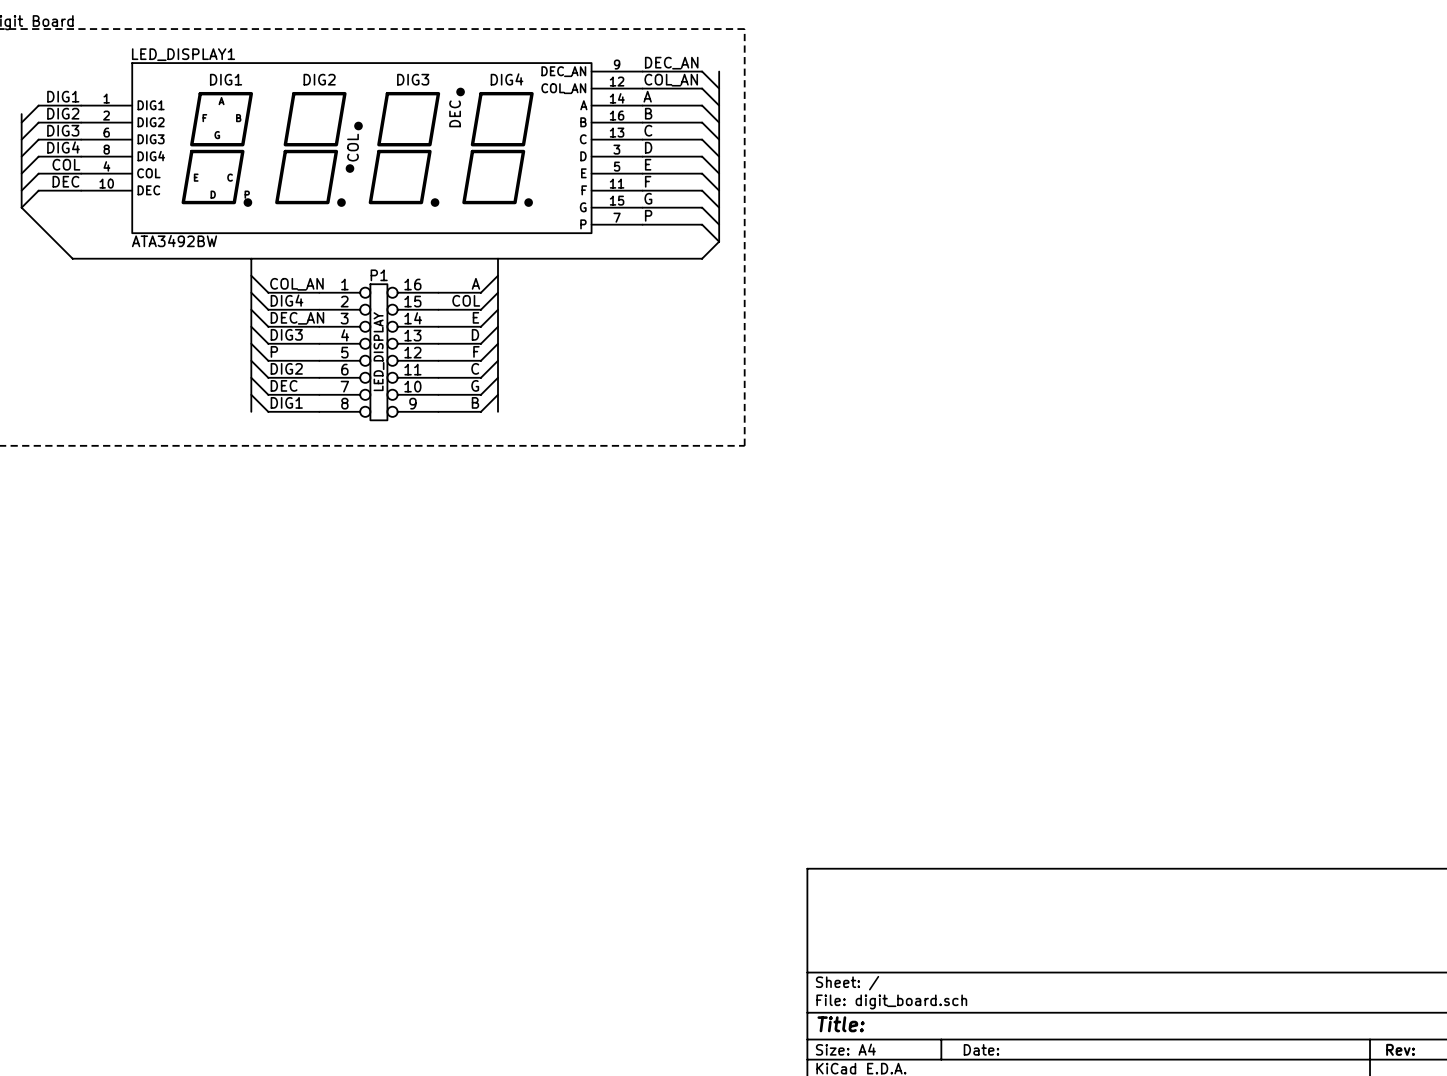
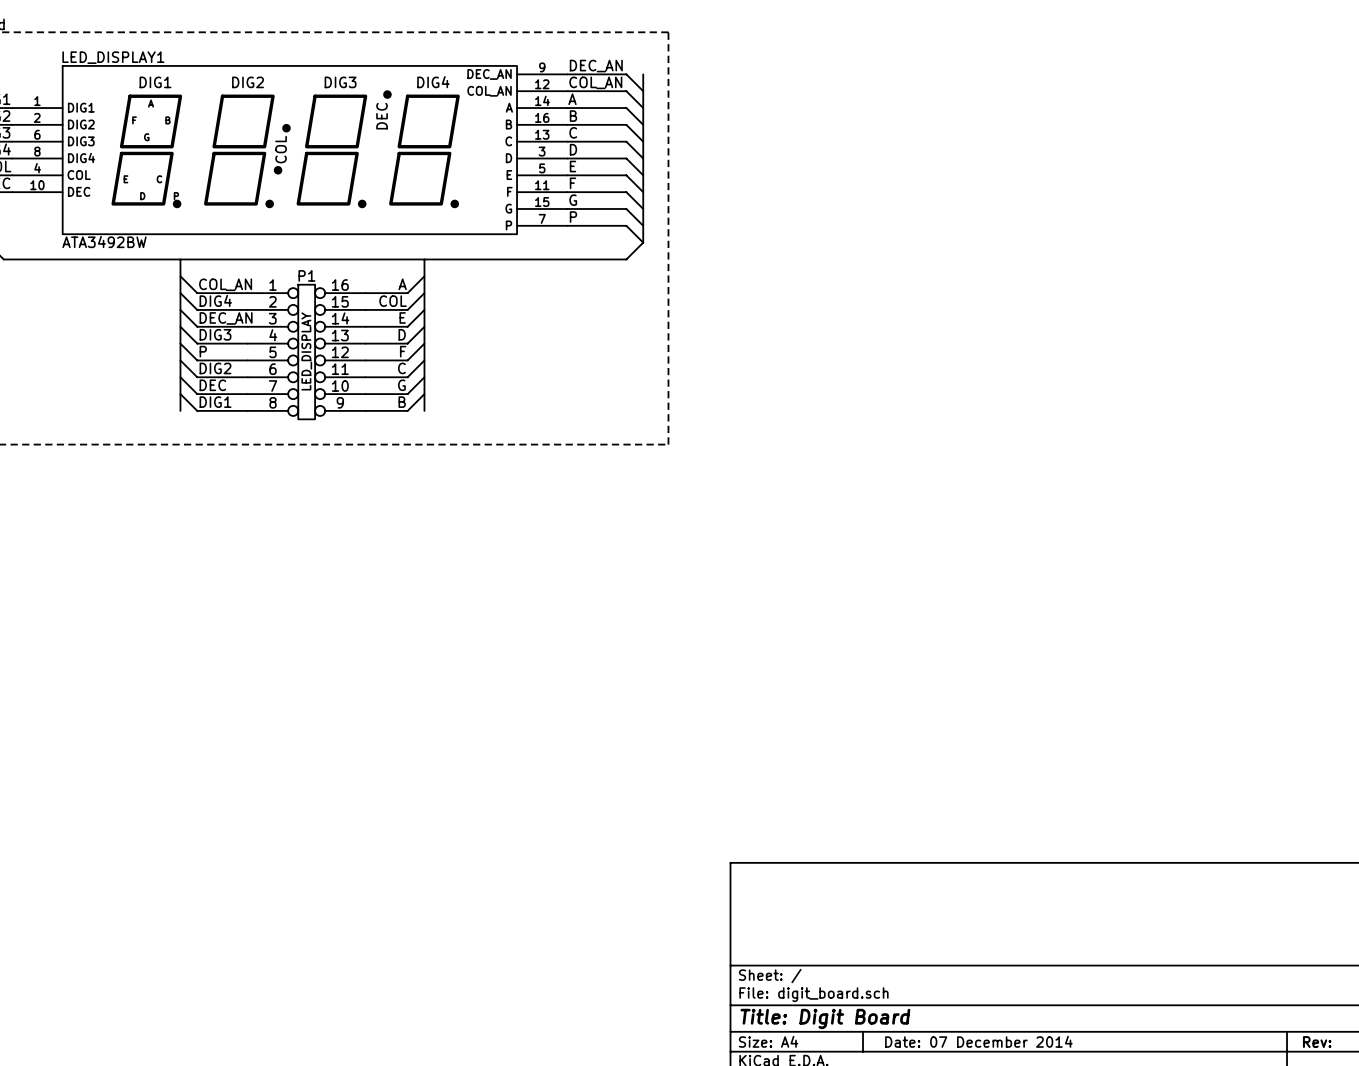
title block: Title: (841, 1024) -> Title: Digit Board (825, 1018)
title block: Date: (981, 1049) -> Date: 07 December 2014 (978, 1041)

